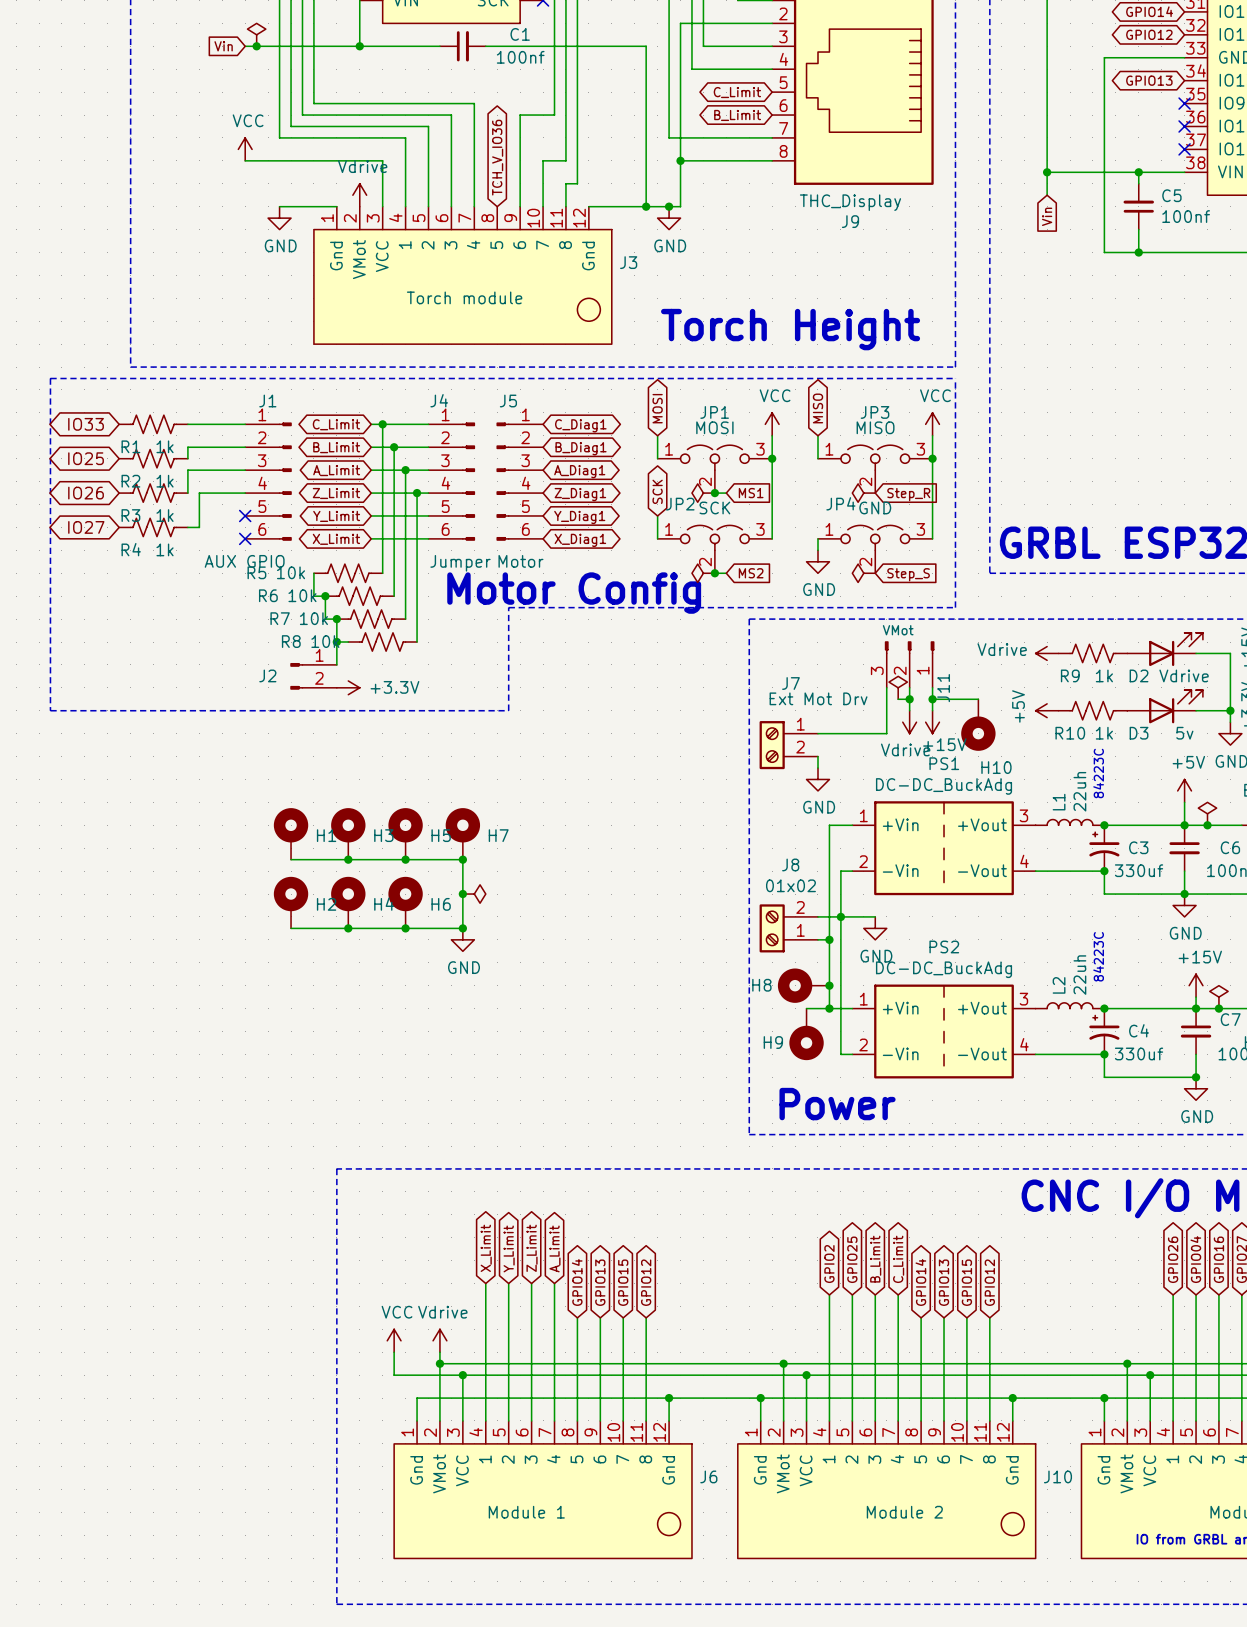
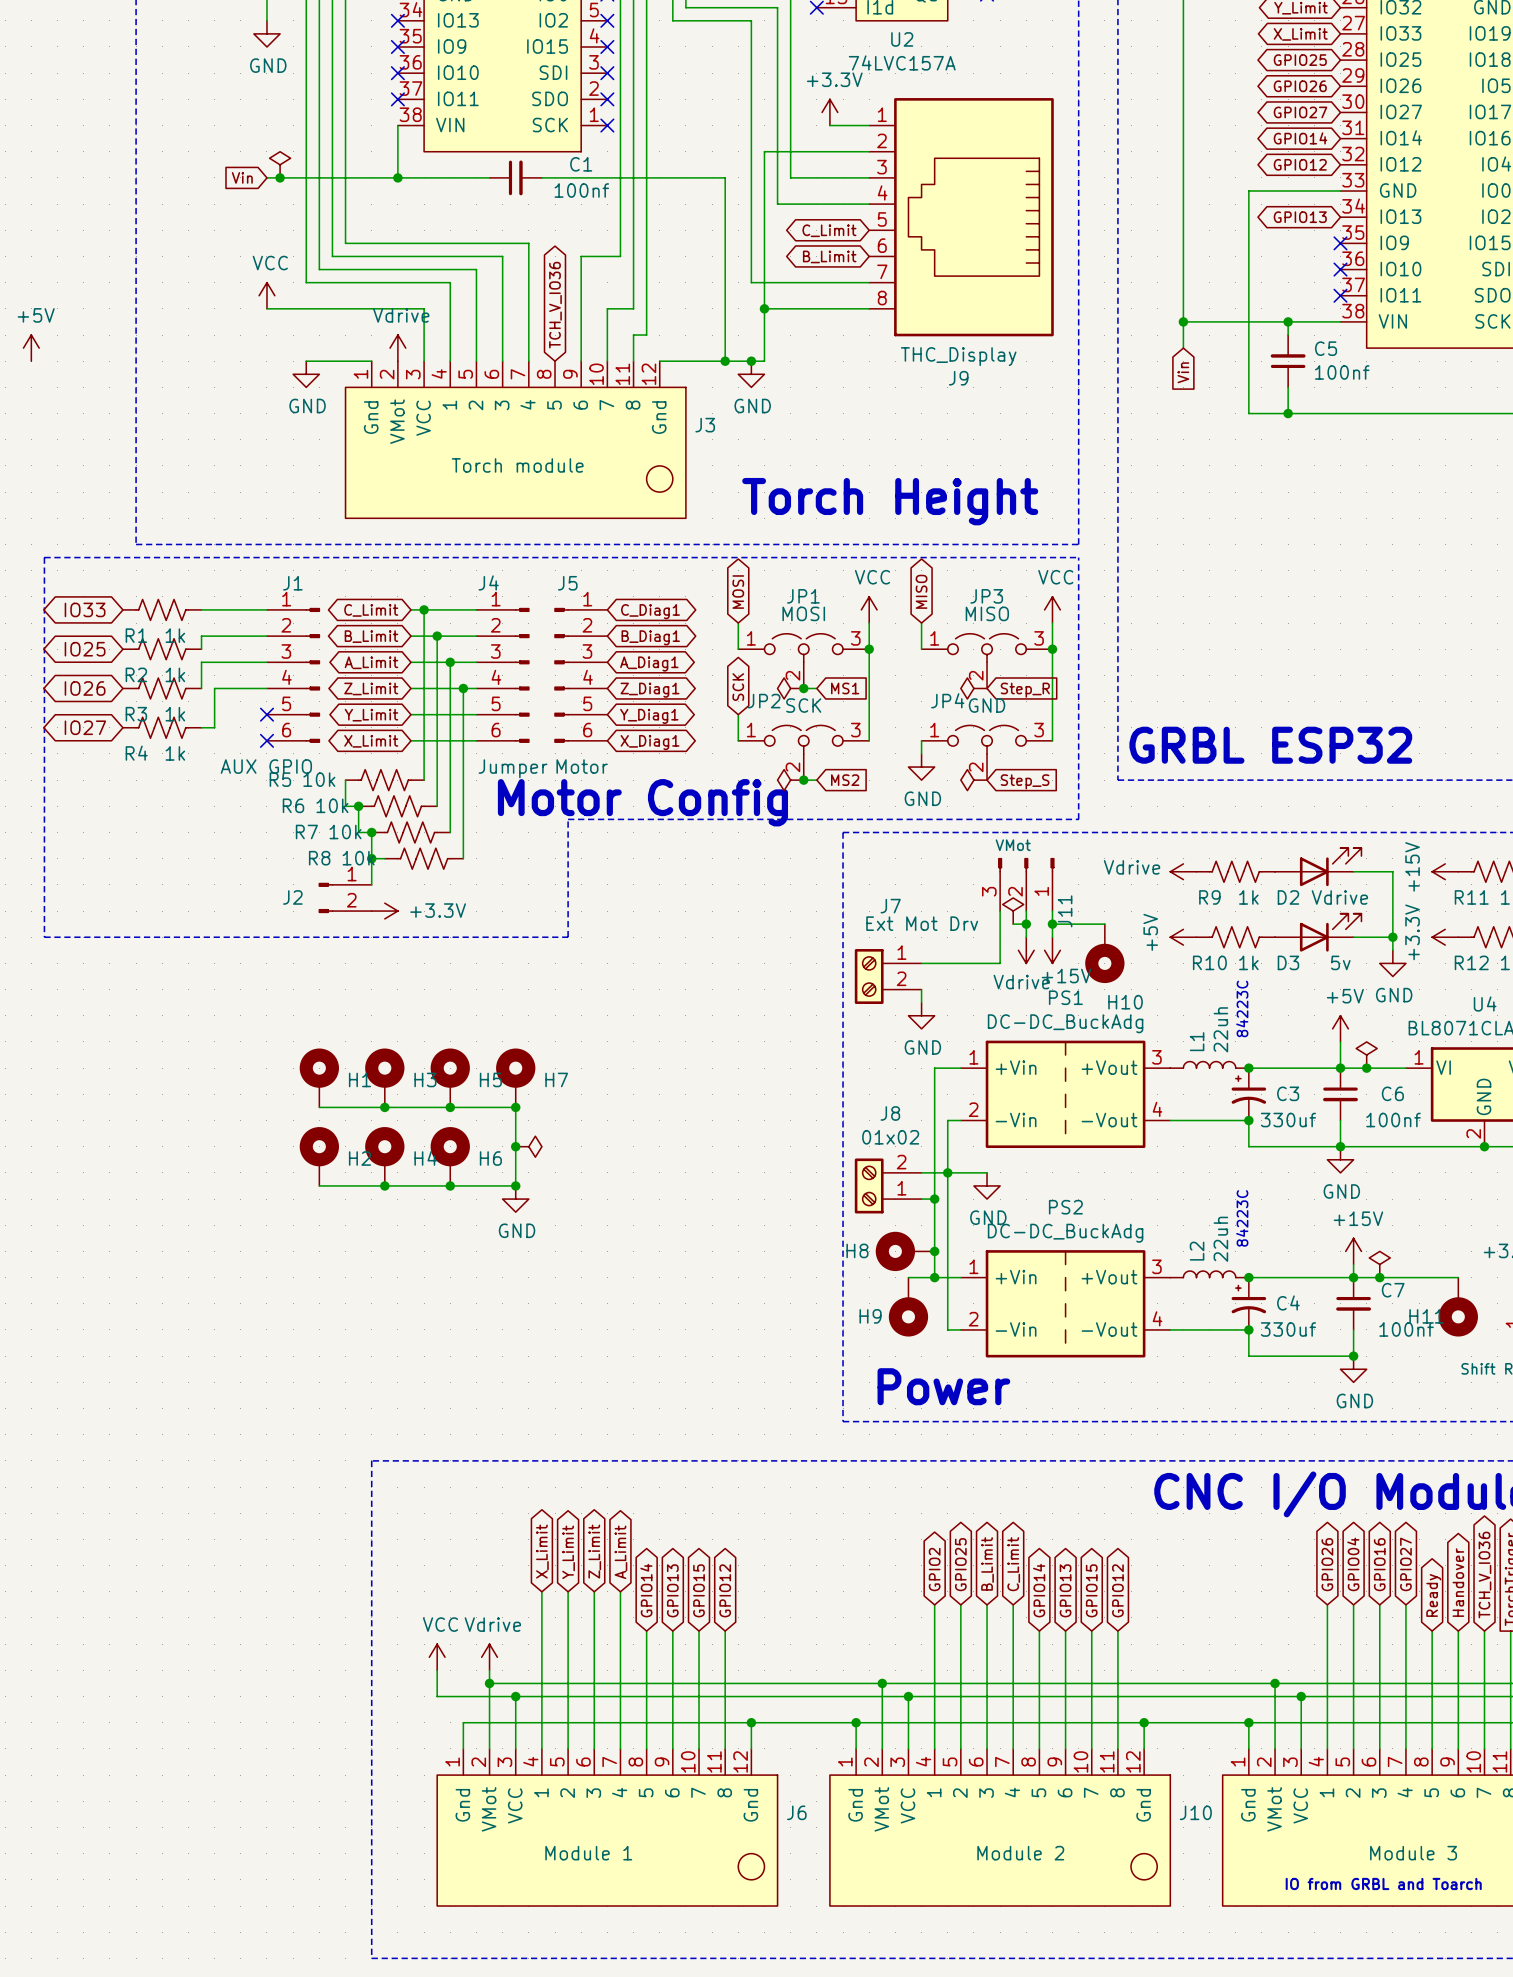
power symbol: none -> +5V (31, 348)

